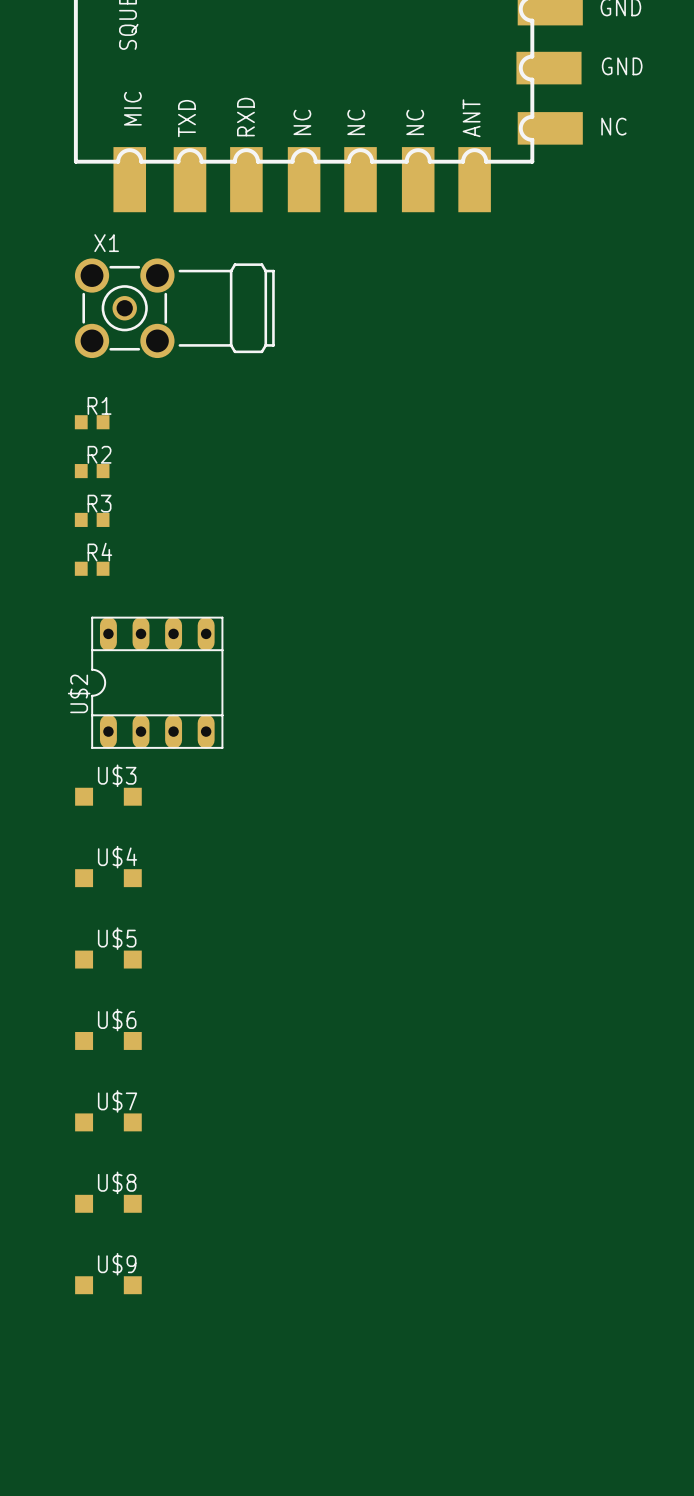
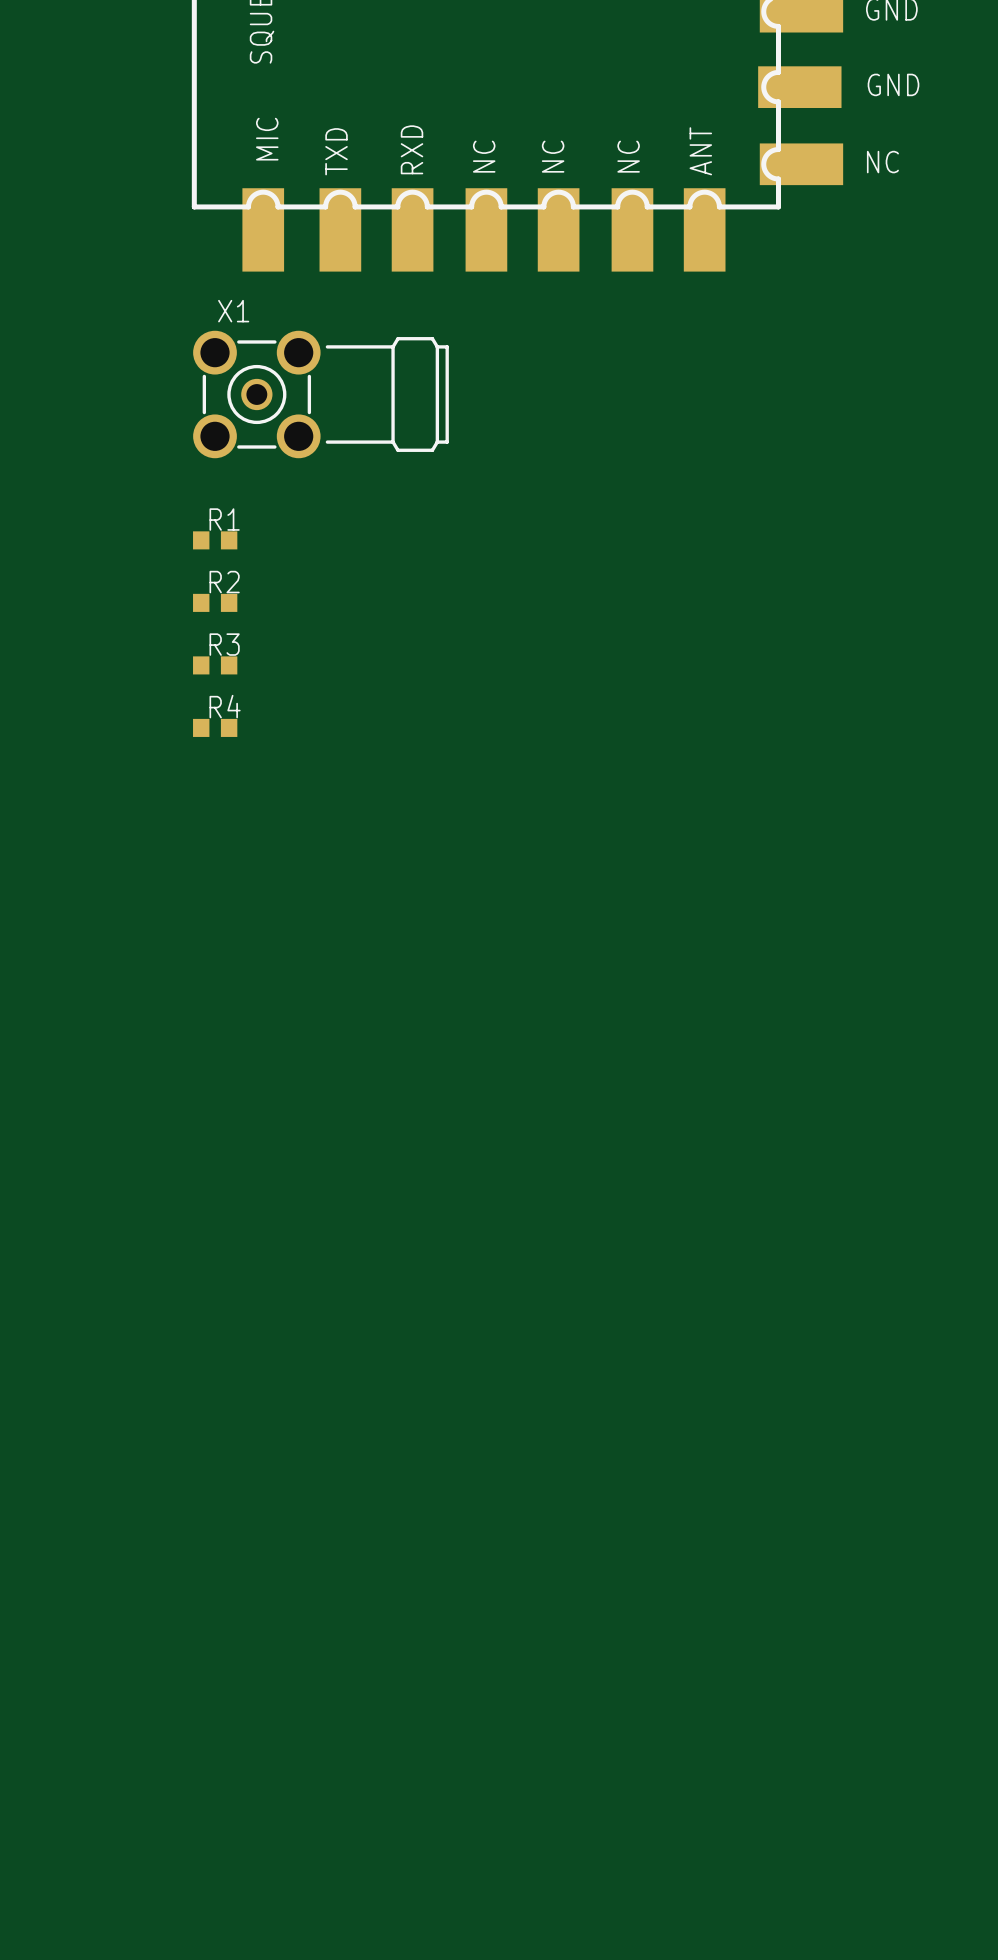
U$2: (157, 682) -> none
U$3: (108, 796) -> none
U$4: (108, 878) -> none
U$5: (108, 959) -> none
U$6: (108, 1040) -> none
U$7: (108, 1122) -> none
U$8: (108, 1203) -> none
U$9: (108, 1285) -> none

